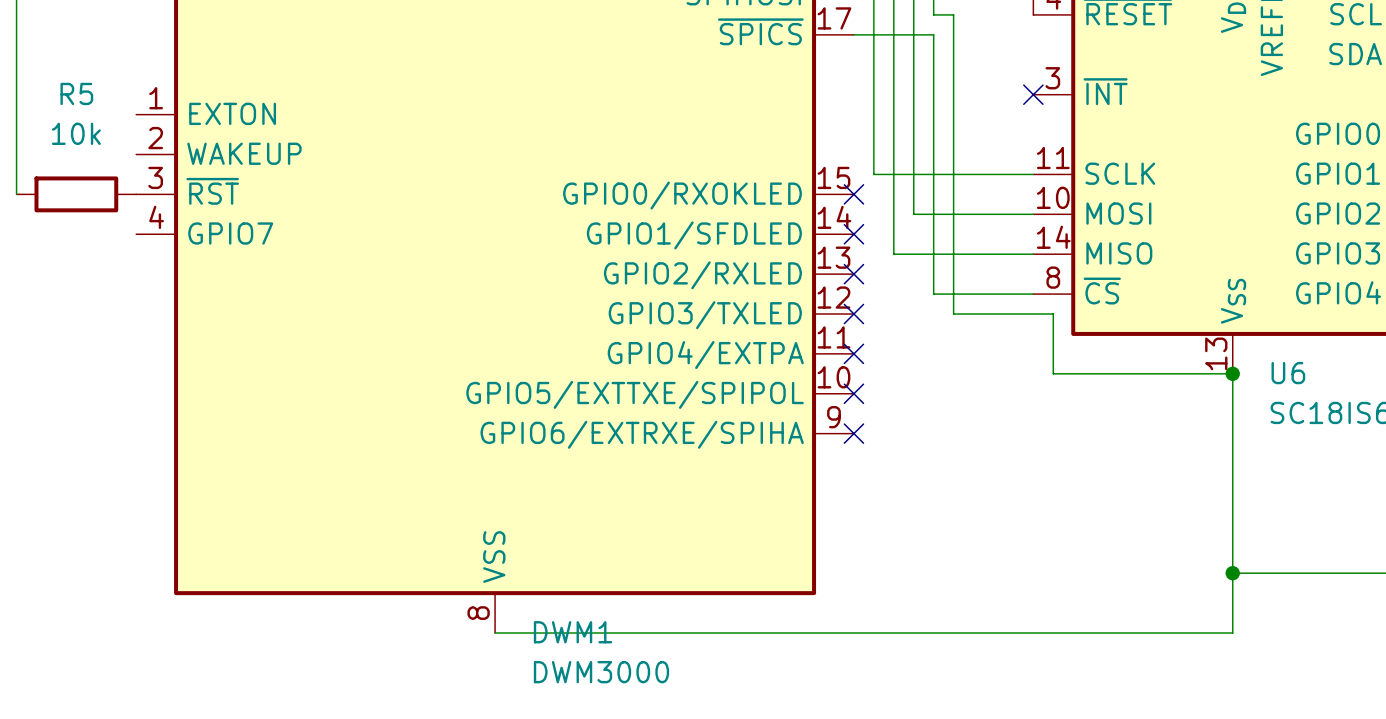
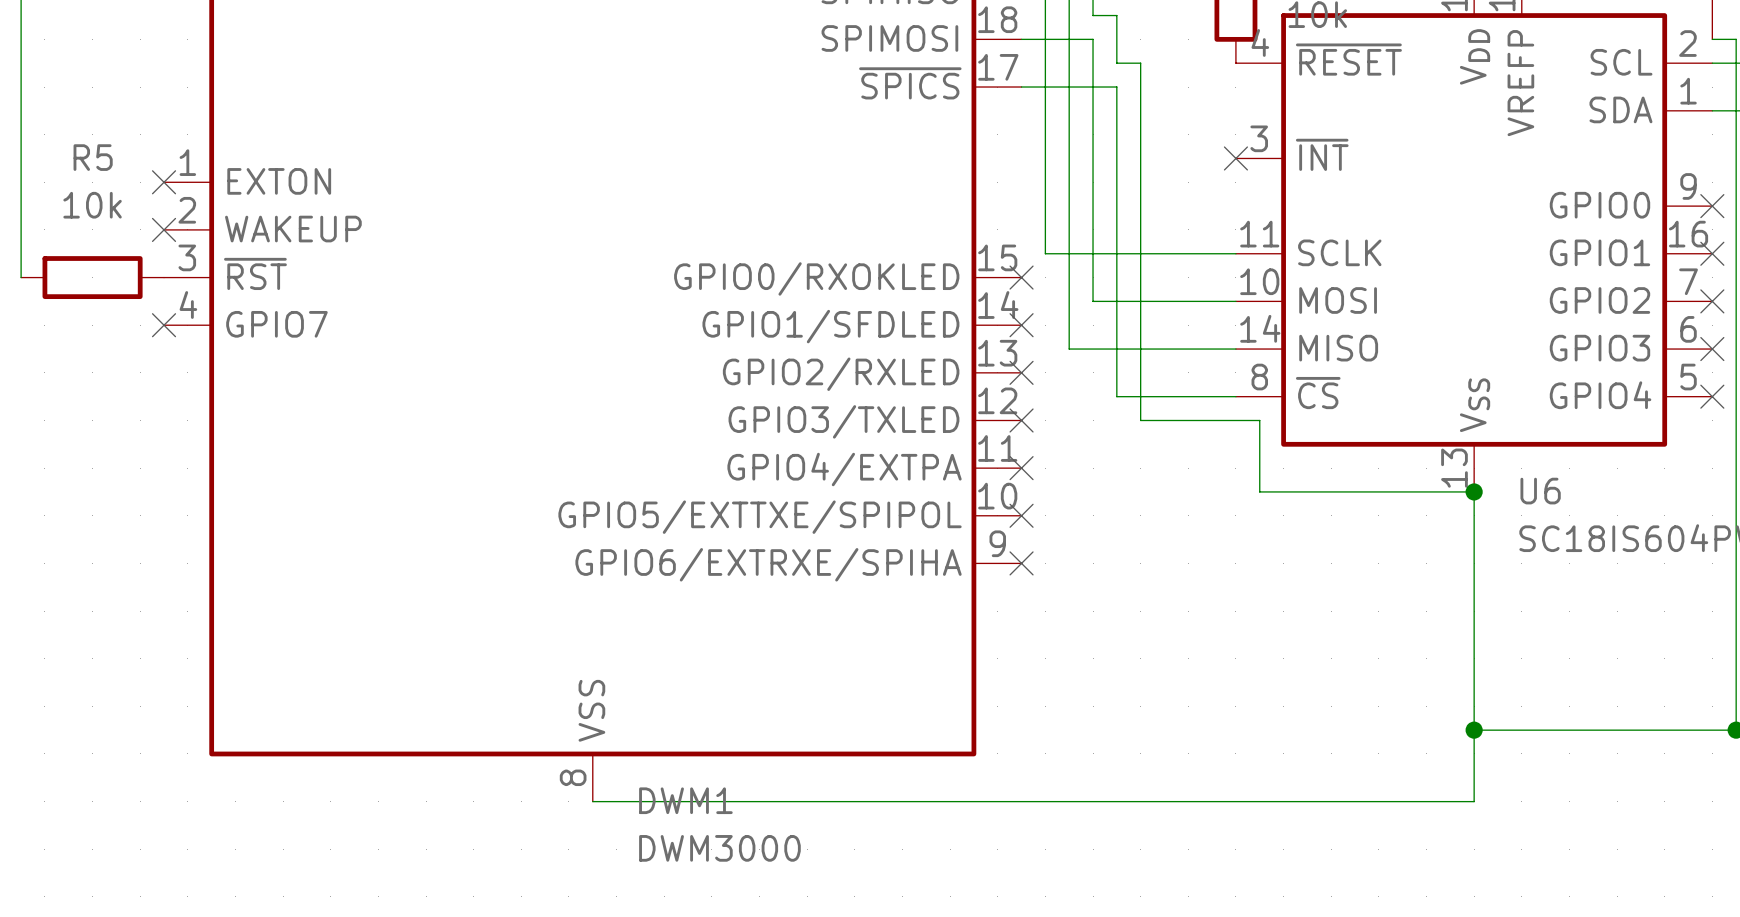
no-connect mark: none -> (164, 182)
no-connect mark: none -> (164, 229)
no-connect mark: none -> (164, 325)

